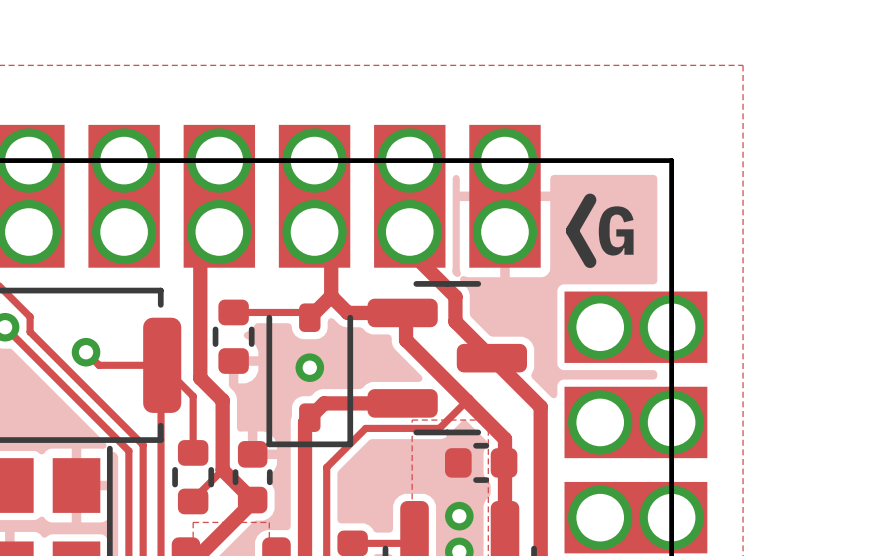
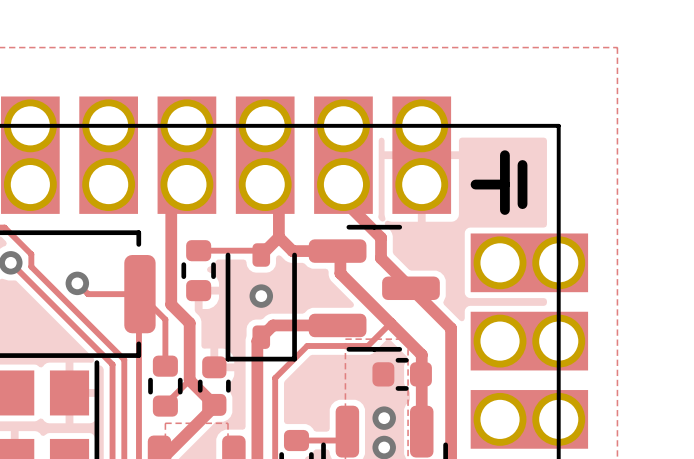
line: none -> (504, 155) (504, 209)
line: (590, 199) (572, 230) (590, 261) -> none
line: none -> (522, 164) (522, 204)
text: G (616, 230) -> none
line: none -> (475, 184) (504, 184)

